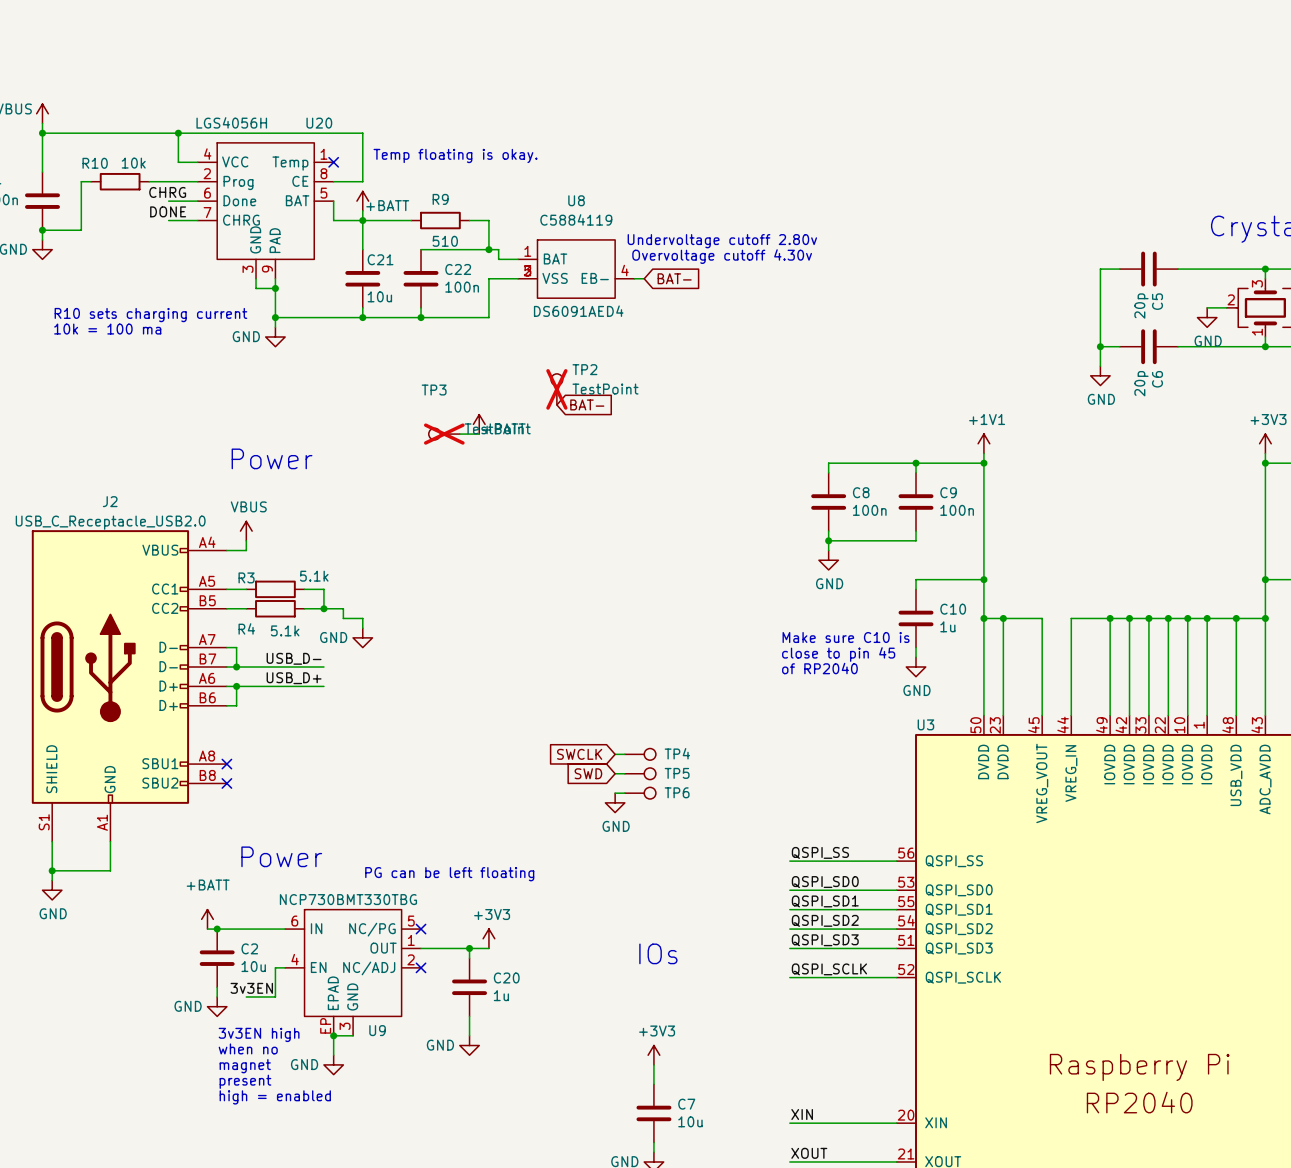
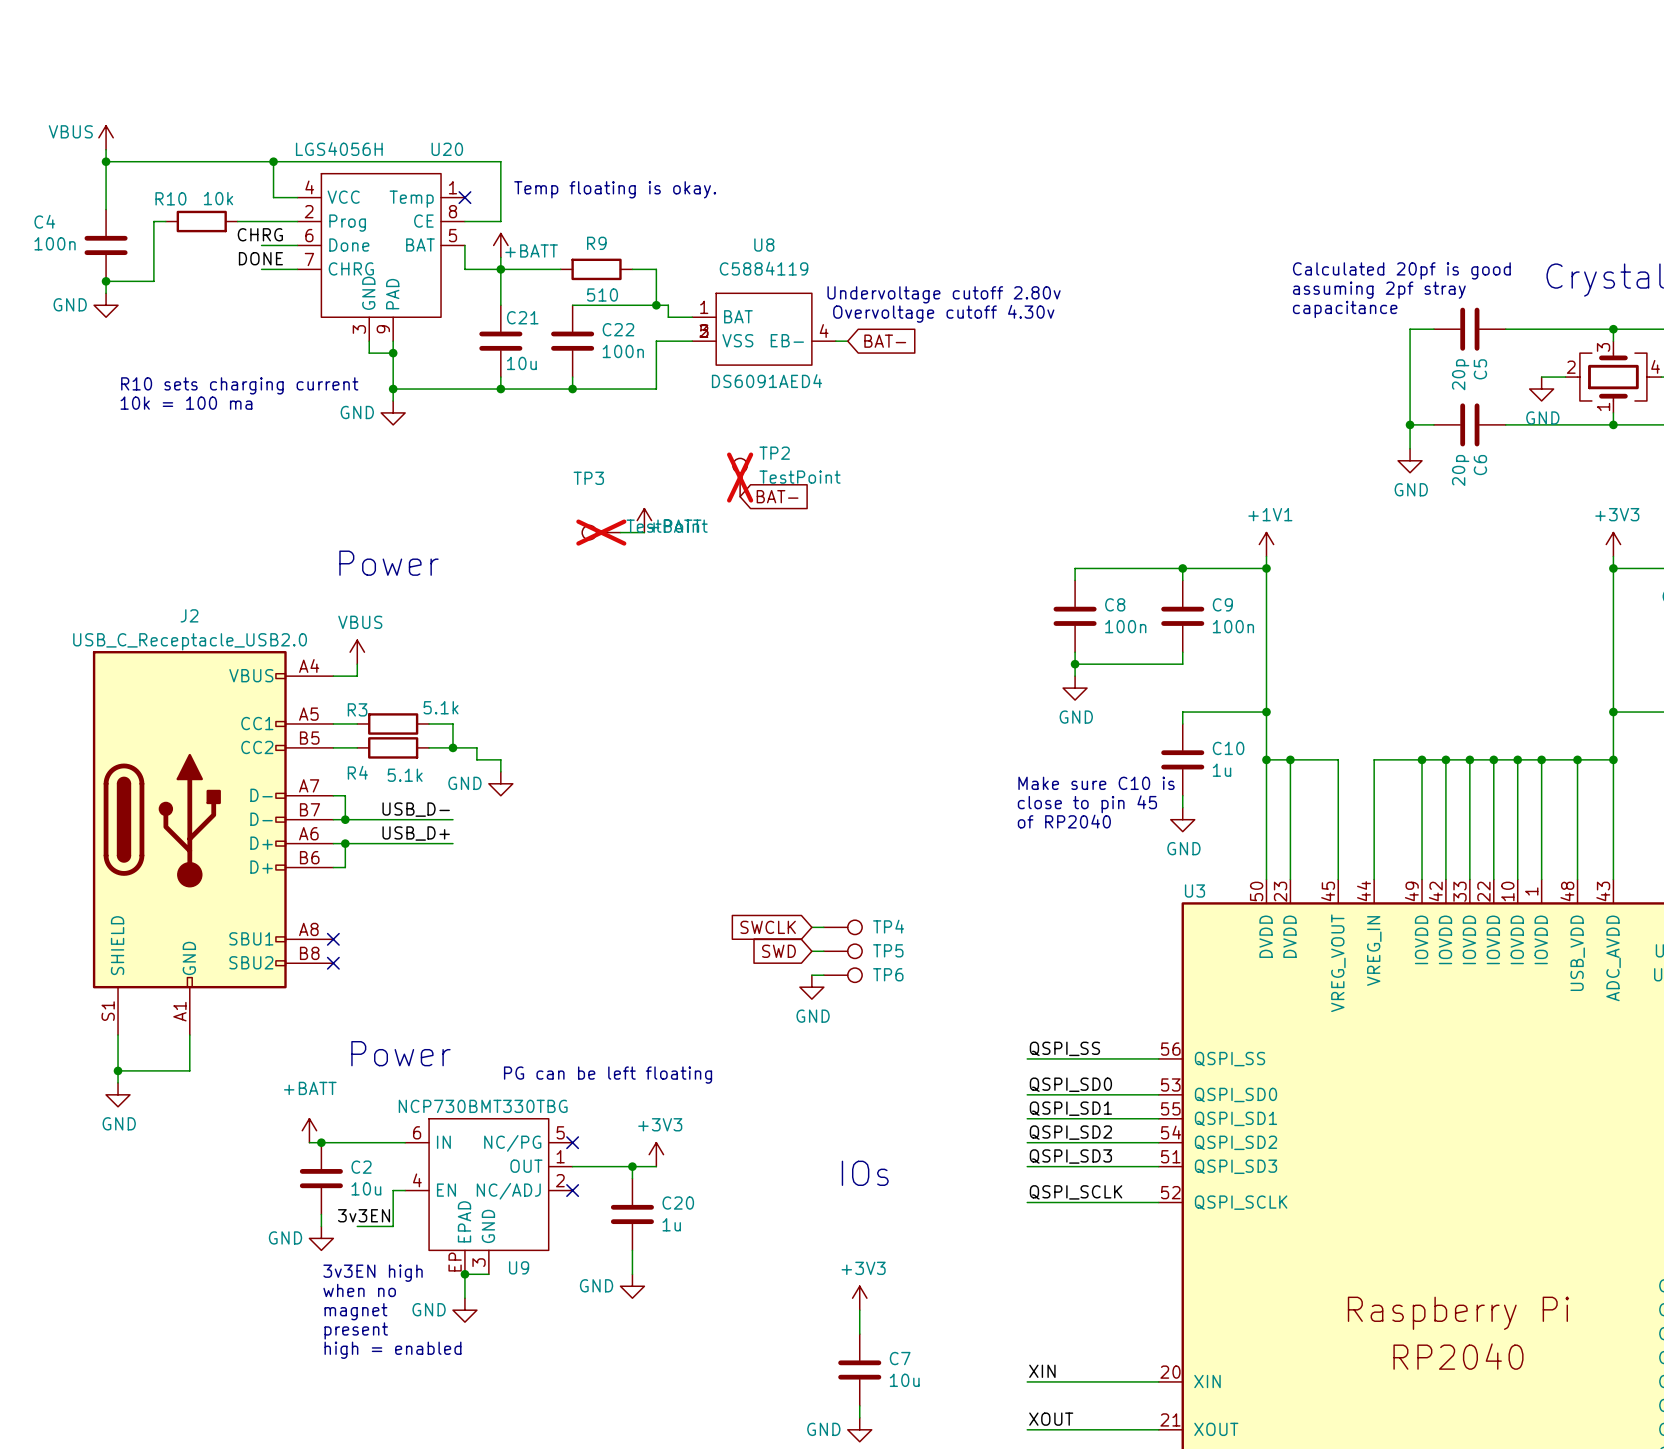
text: none -> Calculated 20pf is good (1401, 270)
text: none -> assuming 2pf stray (1379, 290)
text: none -> capacitance (1345, 309)

